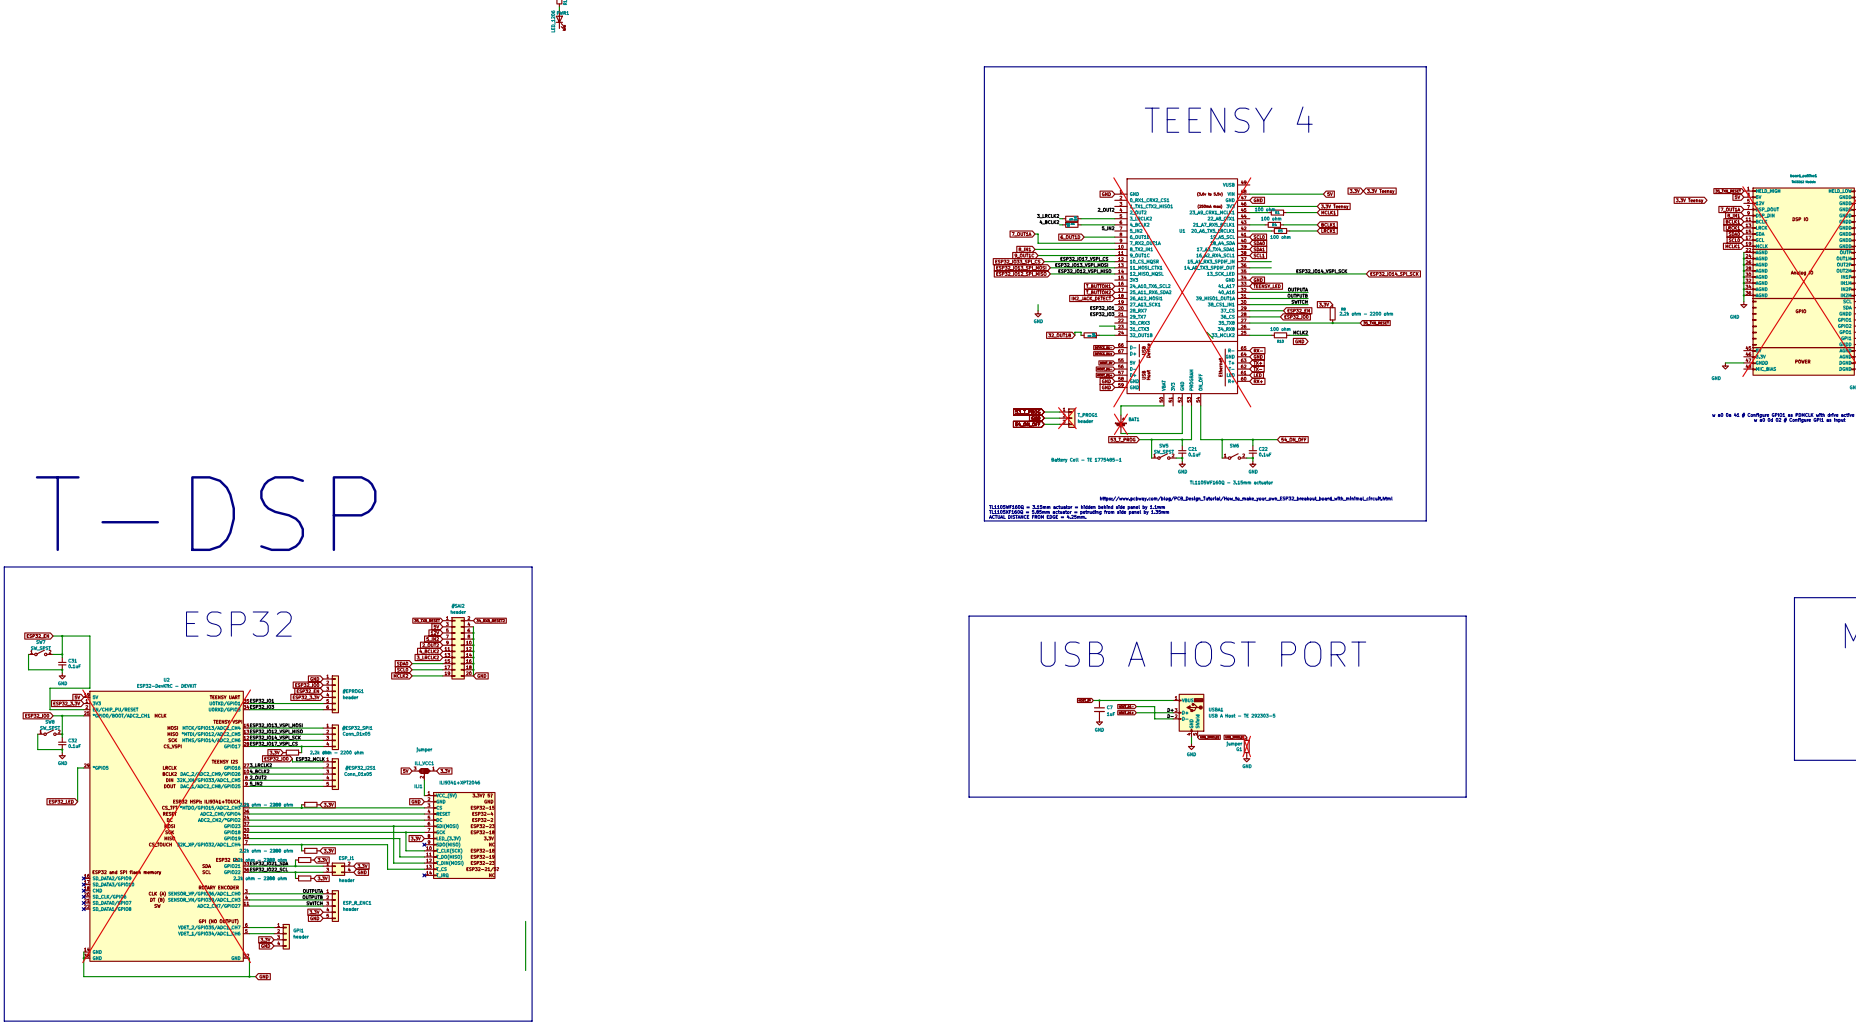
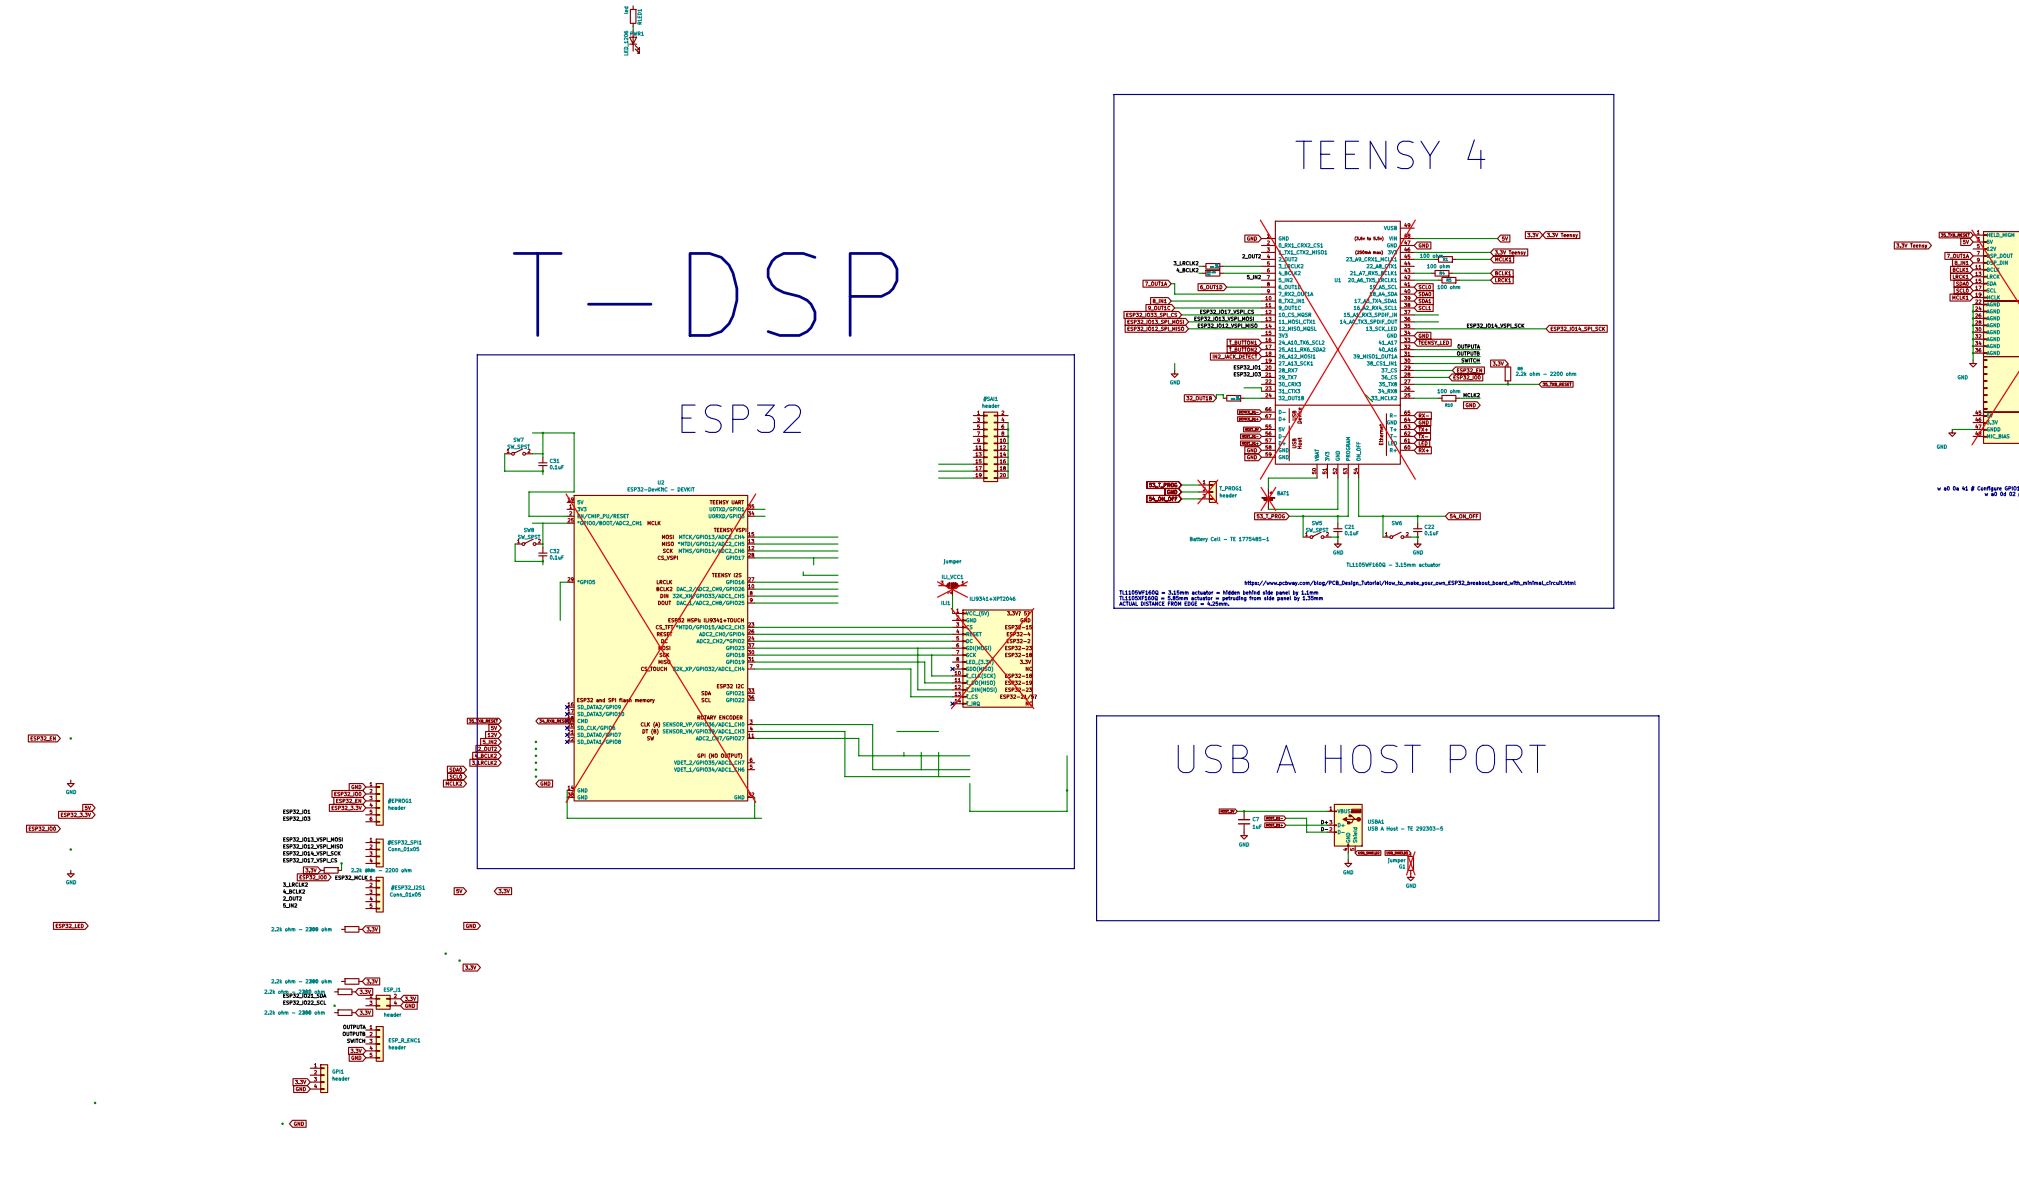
text: none -> T-DSP (705, 294)
line: none -> (477, 354) (1074, 354) (1074, 868) (477, 868) (477, 354)
drawing: none -> [973, 411, 1009, 482]
text: none -> ESP32 (741, 418)
wire: none -> (1008, 422) (1008, 478)
junction: none -> (1008, 429)
wire: none -> (532, 432) (574, 432) (574, 491) (528, 491) (528, 516) (567, 516)
wire: none -> (542, 432) (542, 457)
junction: none -> (1008, 436)
wire: none -> (504, 453) (504, 471) (542, 471) (542, 474)
wire: none -> (532, 453) (542, 453)
wire: none -> (938, 464) (973, 464)
junction: none -> (542, 471)
wire: none -> (938, 471) (973, 471)
wire: none -> (938, 478) (973, 478)
wire: none -> (754, 509) (765, 509)
wire: none -> (754, 516) (765, 516)
wire: none -> (532, 523) (567, 523)
wire: none -> (542, 523) (542, 547)
wire: none -> (754, 537) (837, 537)
wire: none -> (515, 544) (515, 561) (542, 561) (542, 564)
wire: none -> (754, 544) (837, 544)
wire: none -> (754, 550) (837, 550)
wire: none -> (754, 557) (837, 557)
wire: none -> (813, 557) (813, 564)
junction: none -> (542, 561)
wire: none -> (803, 571) (803, 575) (837, 575)
wire: none -> (567, 582) (560, 582) (560, 620)
wire: none -> (754, 582) (837, 582)
wire: none -> (754, 589) (837, 589)
part do-not-place cross: none -> (952, 589)
wire: none -> (754, 596) (837, 596)
wire: none -> (952, 596) (952, 613)
text: T-DSP (206, 513) -> none
wire: none -> (754, 603) (837, 603)
wire: none -> (754, 627) (952, 627)
wire: none -> (754, 634) (952, 634)
wire: none -> (754, 641) (952, 641)
wire: none -> (754, 648) (952, 648)
wire: none -> (917, 648) (917, 689) (952, 689)
wire: none -> (754, 655) (952, 655)
wire: none -> (931, 655) (931, 675) (952, 675)
part do-not-place cross: none -> (992, 658)
line: (4, 566) (532, 566) (532, 1021) (4, 1021) (4, 566) -> none
wire: none -> (754, 662) (924, 662) (924, 682) (952, 682)
wire: none -> (754, 669) (910, 669) (910, 696) (952, 696)
no-connect mark: none -> (952, 669)
no-connect mark: none -> (952, 703)
no-connect mark: none -> (567, 707)
no-connect mark: none -> (567, 714)
drawing: [442, 617, 474, 680] -> none
no-connect mark: none -> (567, 721)
wire: none -> (754, 724) (872, 724) (872, 769) (969, 769)
text: ESP32 (238, 624) -> none
wire: (473, 626) (473, 675) -> none
no-connect mark: none -> (567, 728)
wire: none -> (754, 731) (844, 731) (844, 776) (969, 776)
wire: none -> (896, 731) (938, 731)
no-connect mark: none -> (567, 734)
wire: (53, 636) (89, 636) (89, 688) (50, 688) (50, 709) (83, 709) -> none
wire: (62, 636) (62, 657) -> none
wire: none -> (754, 738) (858, 738) (858, 755) (969, 755)
no-connect mark: none -> (567, 741)
wire: none -> (903, 752) (903, 755)
wire: none -> (921, 752) (921, 769)
wire: none -> (938, 752) (938, 776)
wire: none -> (1067, 755) (1067, 811) (969, 811) (969, 783)
part position: (40, 652) -> (518, 452)
wire: (28, 654) (28, 669) (62, 669) (62, 672) -> none
wire: (53, 654) (62, 654) -> none
part position: (62, 663) -> (542, 464)
wire: (412, 663) (442, 663) -> none
wire: (412, 669) (442, 669) -> none
wire: (412, 675) (442, 675) -> none
wire: none -> (567, 790) (567, 818) (761, 818)
junction: none -> (1067, 790)
wire: none -> (754, 797) (754, 818)
wire: (249, 703) (323, 703) -> none
wire: (249, 709) (323, 709) -> none
wire: (53, 715) (83, 715) -> none
wire: (62, 715) (62, 737) -> none
wire: (249, 728) (323, 728) -> none
part position: (50, 732) -> (528, 542)
wire: (37, 734) (37, 749) (62, 749) (62, 752) -> none
wire: (249, 734) (323, 734) -> none
wire: (249, 740) (323, 740) -> none
part position: (62, 743) -> (542, 554)
wire: (249, 746) (323, 746) -> none
wire: (292, 758) (292, 761) (323, 761) -> none
wire: (83, 767) (77, 767) (77, 801) -> none
wire: (249, 767) (323, 767) -> none
wire: (249, 774) (323, 774) -> none
part position: (424, 774) -> (952, 589)
wire: (249, 780) (323, 780) -> none
wire: (424, 780) (424, 795) -> none
wire: (249, 786) (323, 786) -> none
wire: (301, 804) (301, 807) -> none
wire: (249, 807) (424, 807) -> none
wire: (249, 814) (424, 814) -> none
wire: (249, 820) (424, 820) -> none
part position: (166, 826) -> (660, 648)
wire: (249, 826) (424, 826) -> none
wire: (393, 826) (393, 863) (424, 863) -> none
wire: (249, 832) (424, 832) -> none
wire: (405, 832) (405, 850) (424, 850) -> none
part position: (459, 835) -> (992, 658)
wire: (249, 838) (399, 838) (399, 856) (424, 856) -> none
wire: (249, 844) (387, 844) (387, 869) (424, 869) -> none
wire: (301, 844) (301, 850) -> none
no-connect mark: (424, 844) -> none
wire: (295, 860) (295, 866) -> none
wire: (249, 866) (323, 866) -> none
wire: (249, 872) (323, 872) -> none
wire: (295, 872) (295, 878) -> none
no-connect mark: (424, 875) -> none
no-connect mark: (83, 878) -> none
no-connect mark: (83, 884) -> none
no-connect mark: (83, 890) -> none
wire: (249, 893) (323, 893) -> none
no-connect mark: (83, 896) -> none
wire: (249, 899) (323, 899) -> none
no-connect mark: (83, 902) -> none
wire: (249, 906) (323, 906) -> none
no-connect mark: (83, 909) -> none
wire: (525, 921) (525, 970) -> none
wire: (249, 927) (274, 927) -> none
wire: (249, 933) (274, 933) -> none
wire: (83, 952) (83, 976) (255, 976) -> none
wire: (249, 958) (249, 976) -> none

